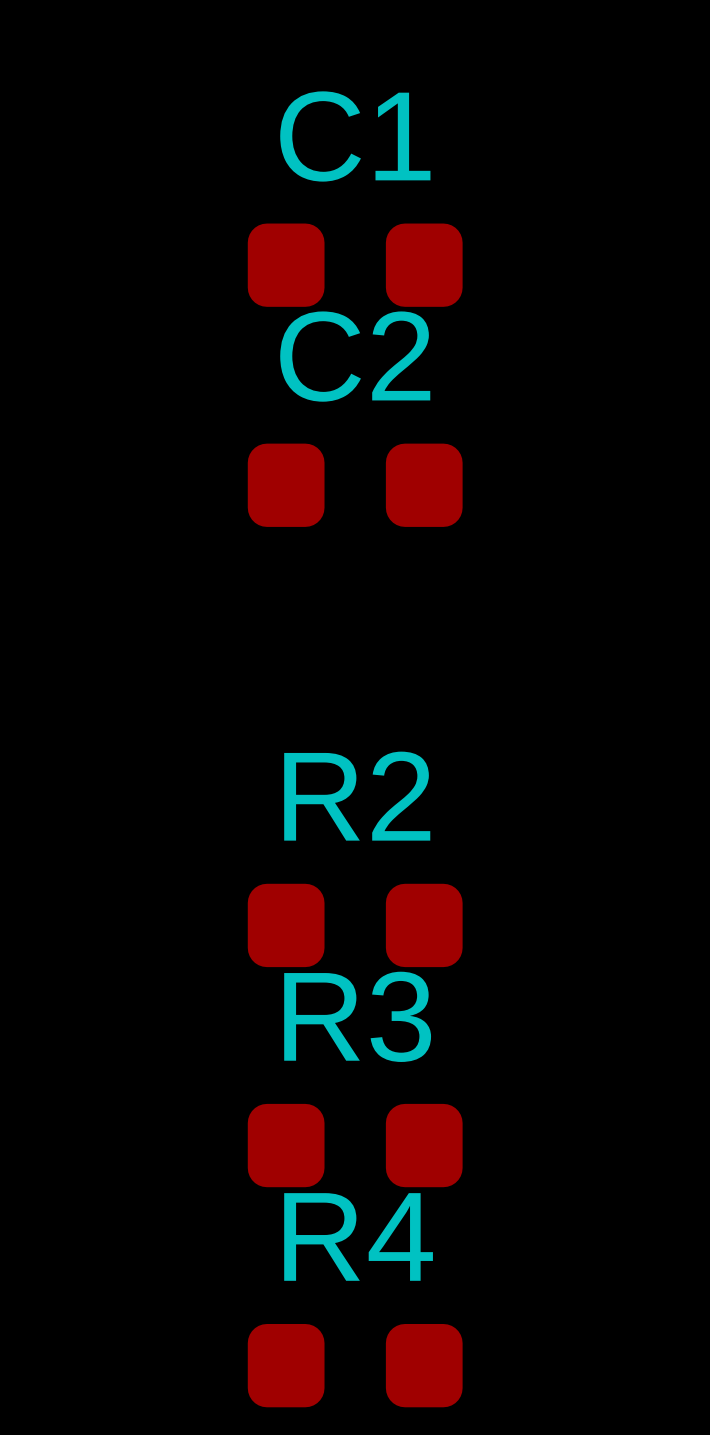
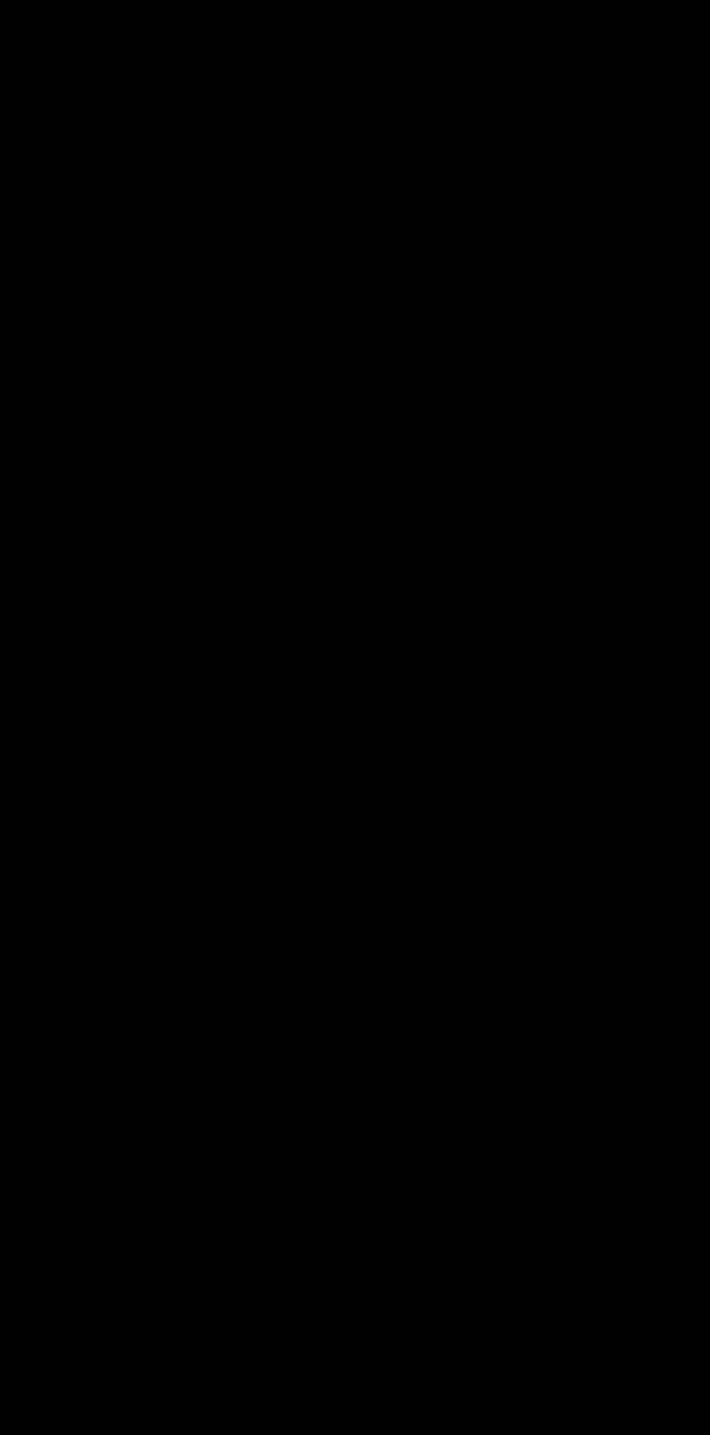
C1: (355, 265) -> none
C2: (355, 485) -> none
R2: (355, 925) -> none
R3: (355, 1145) -> none
R4: (355, 1365) -> none

